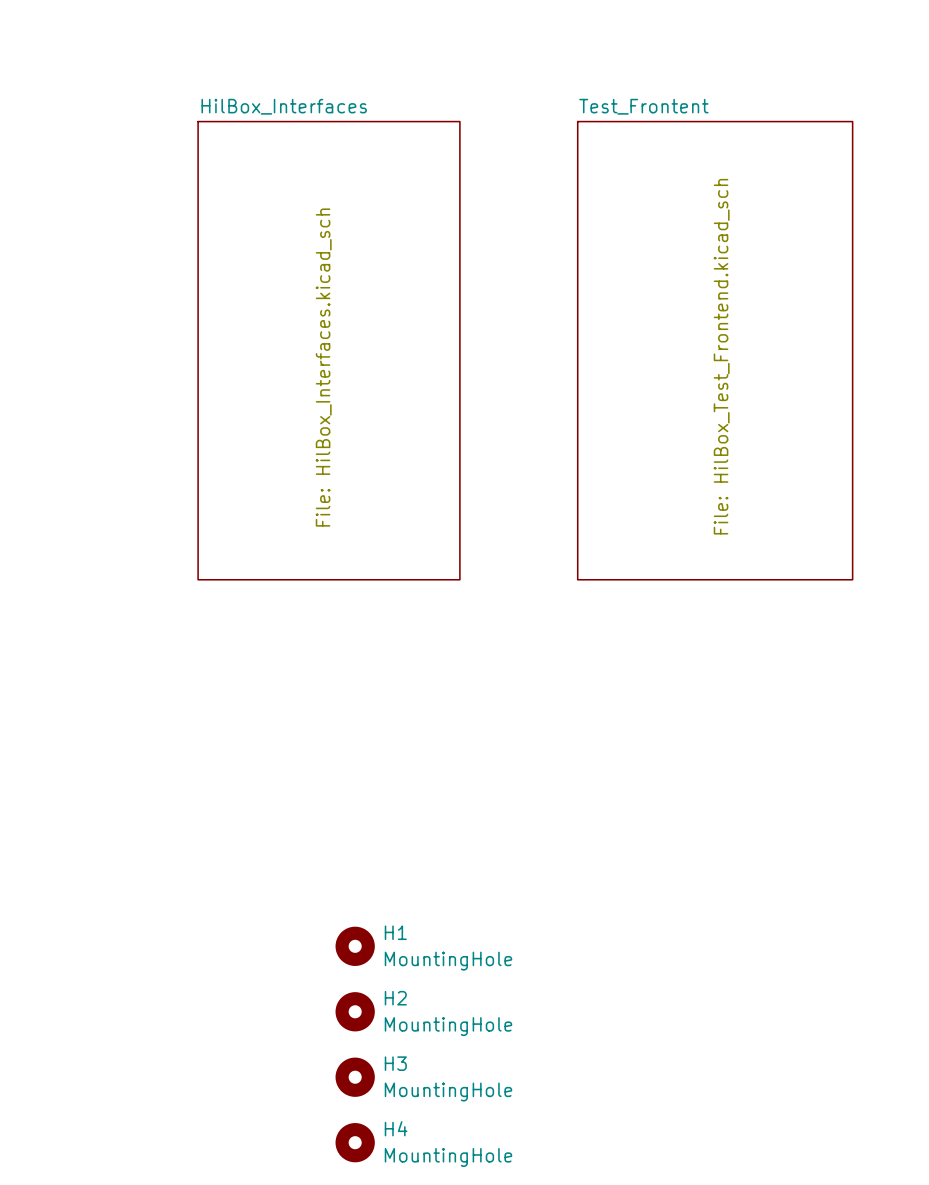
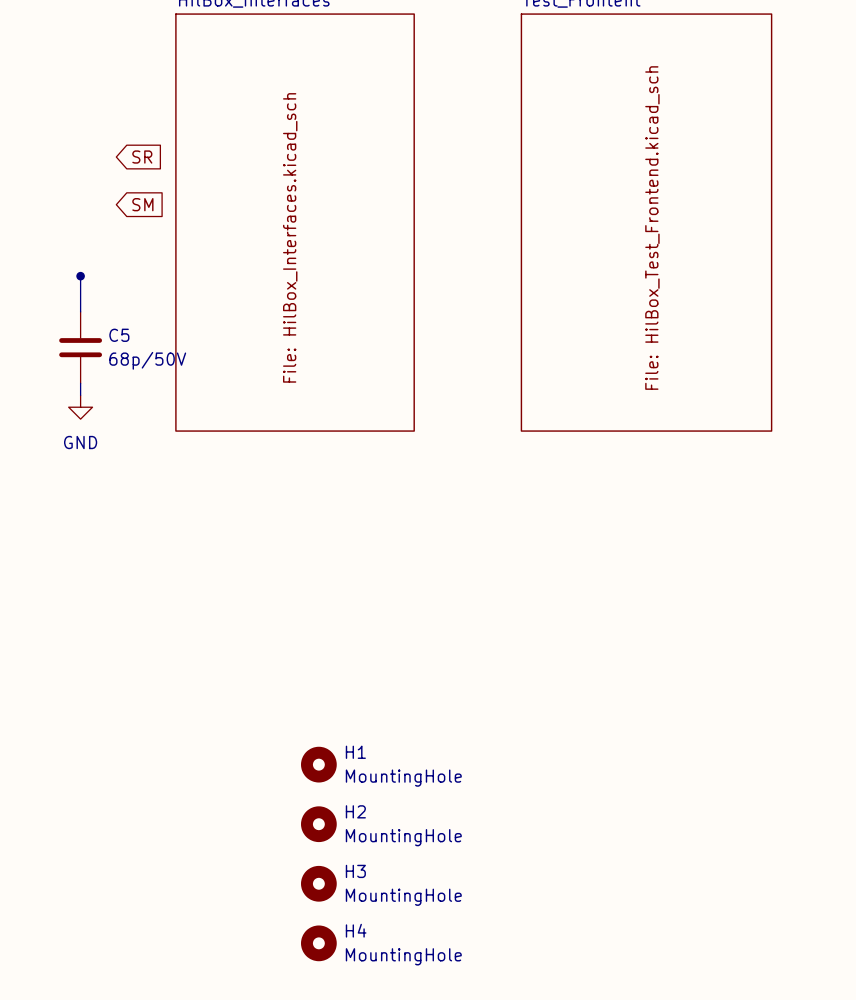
global label: none -> SR (142, 157)
global label: none -> SM (142, 204)
wire: none -> (80, 276) (80, 311)
junction: none -> (80, 276)
C5: none -> 68p/50V (80, 347)
wire: none -> (80, 383) (80, 395)
power symbol: none -> GND (80, 407)

